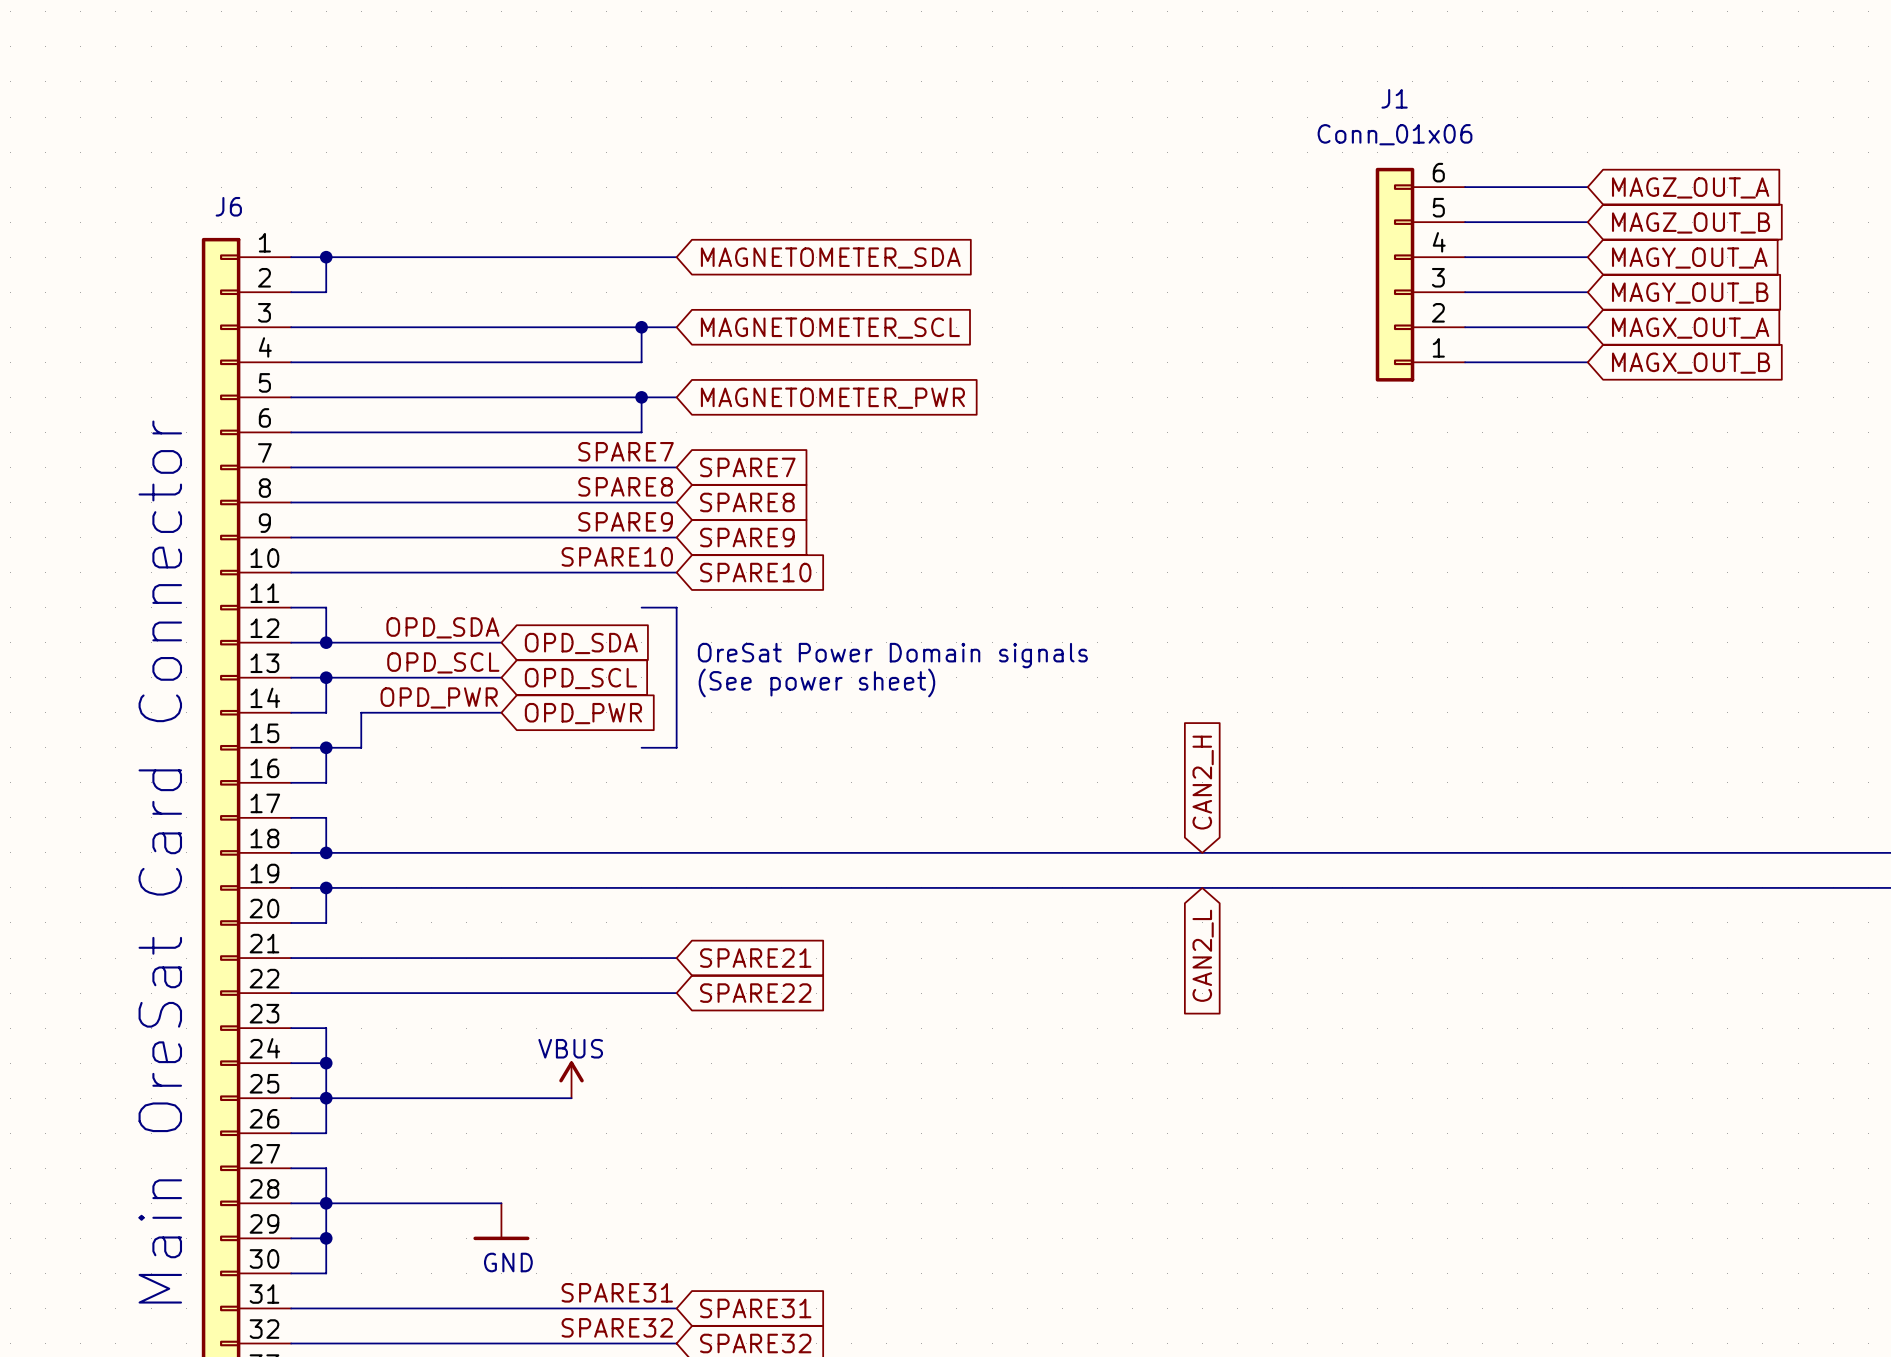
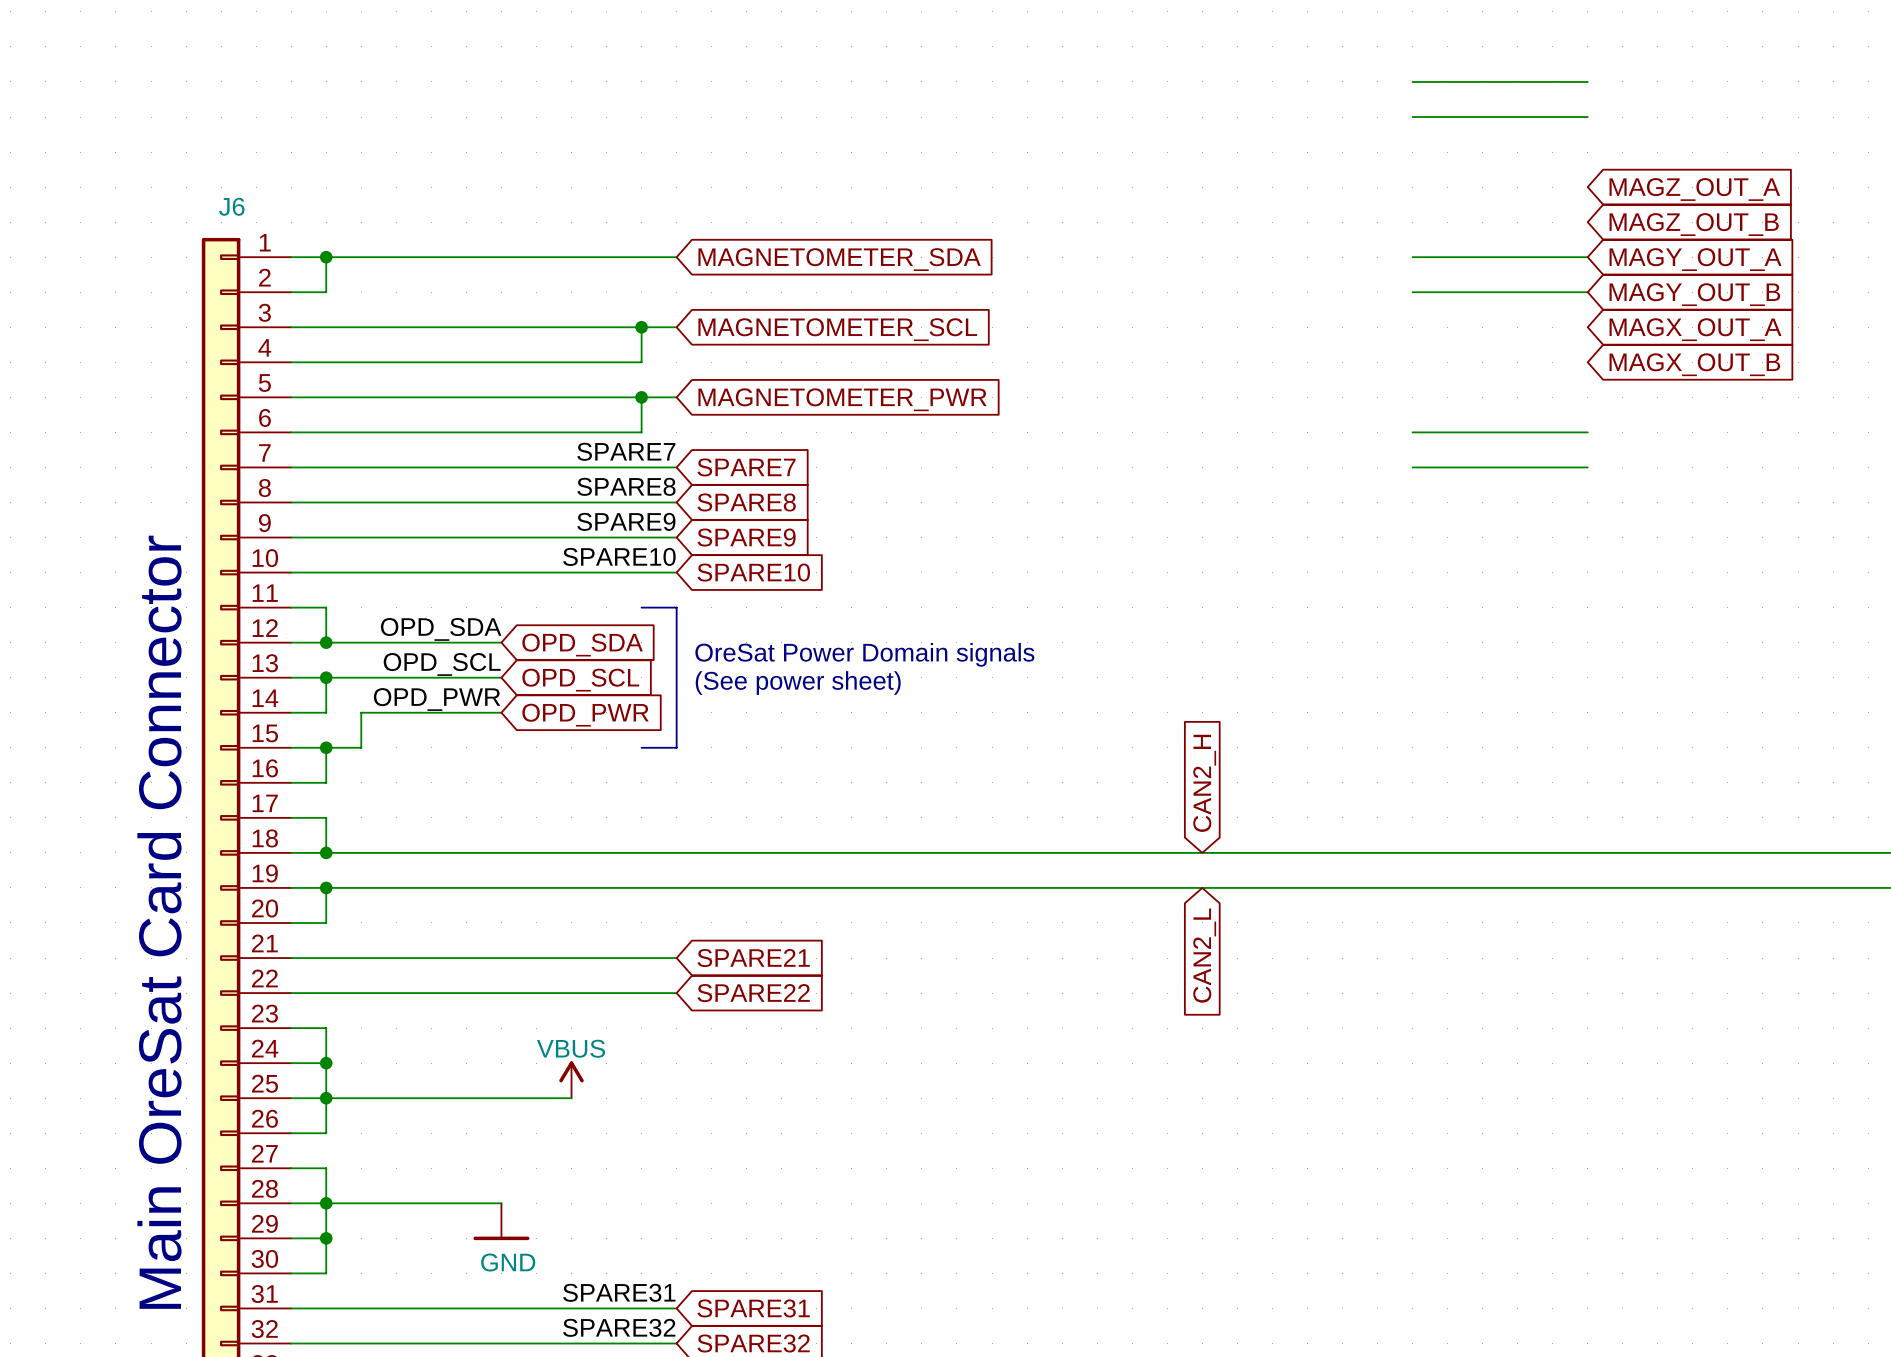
wire: none -> (1412, 81) (1587, 81)
wire: none -> (1412, 117) (1587, 117)
wire: (1465, 187) (1587, 187) -> none
wire: (1465, 222) (1587, 222) -> none
J1: Conn_01x06 (1420, 274) -> none
wire: (1465, 327) (1587, 327) -> none
wire: (1465, 362) (1587, 362) -> none
wire: none -> (1412, 432) (1587, 432)
wire: none -> (1412, 467) (1587, 467)

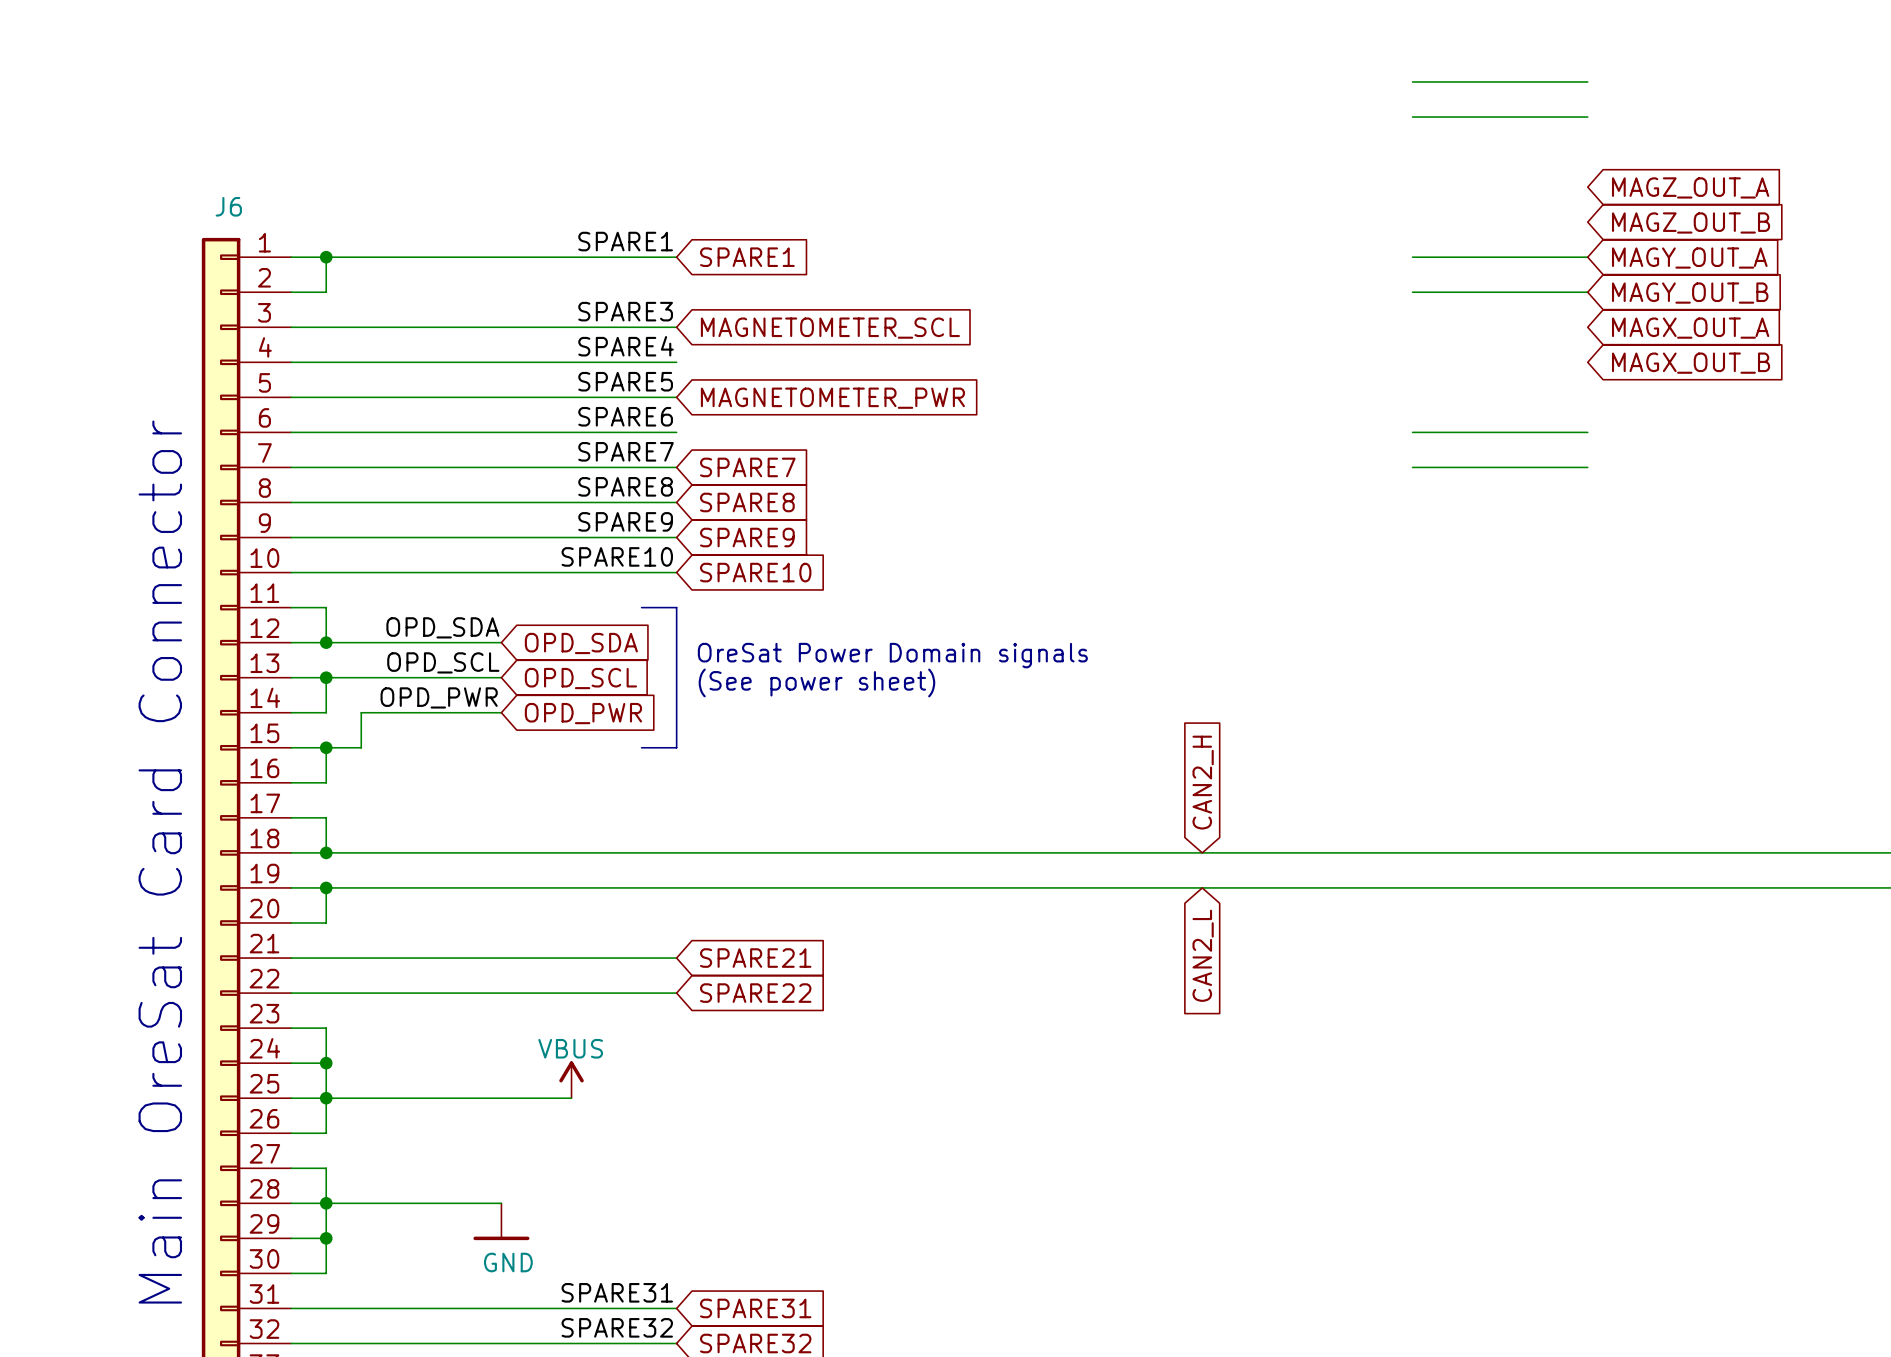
label: none -> SPARE1 (625, 241)
global label: MAGNETOMETER_SDA (839, 259) -> SPARE1 (747, 257)
label: none -> SPARE3 (625, 311)
wire: (641, 327) (641, 362) -> (676, 362) (641, 362)
junction: (641, 327) -> none
label: none -> SPARE4 (626, 346)
label: none -> SPARE5 (625, 381)
wire: (641, 397) (641, 432) -> (676, 432) (641, 432)
junction: (641, 397) -> none
label: none -> SPARE6 (625, 416)

